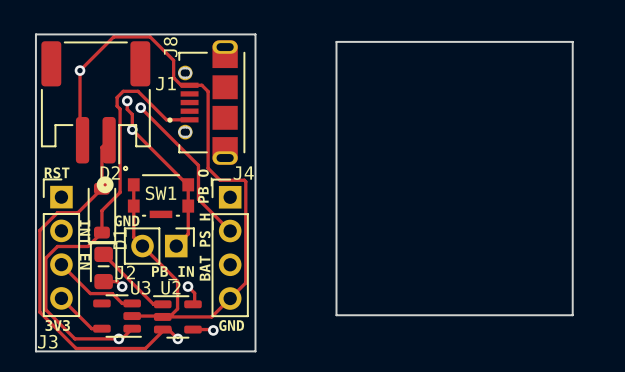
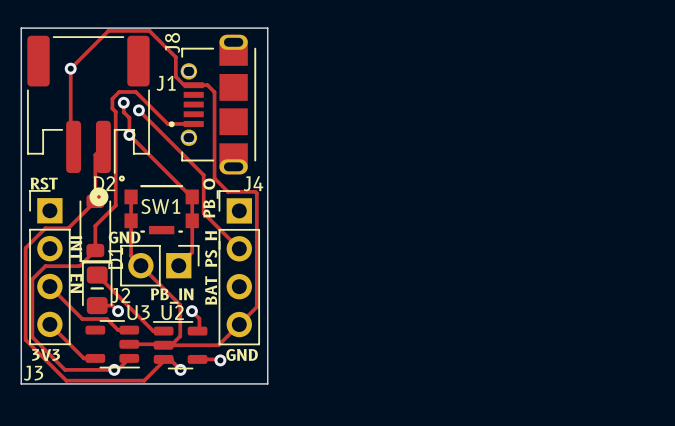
board edge: (336, 41) (572, 41) (572, 315) (336, 315) (336, 41) -> none

